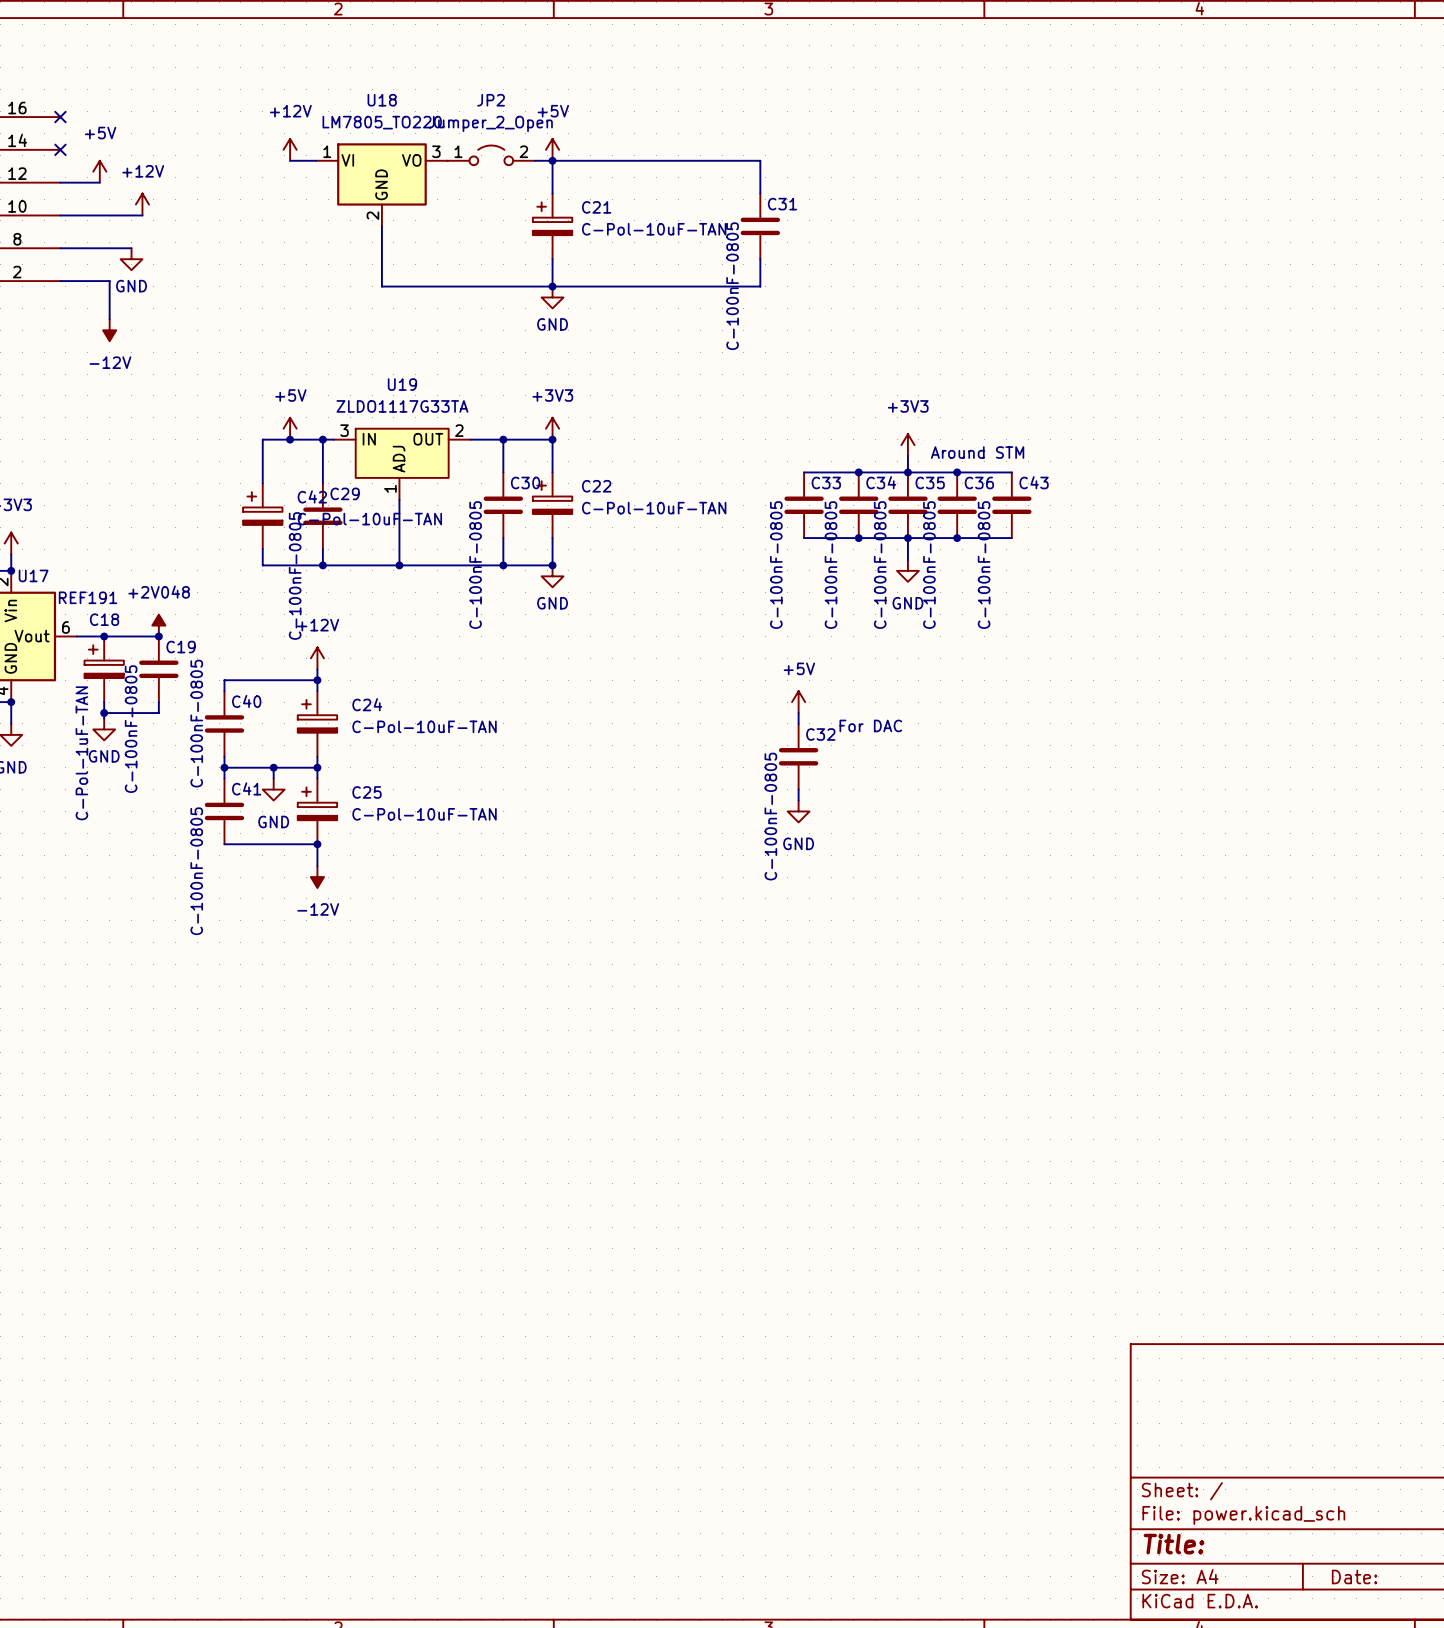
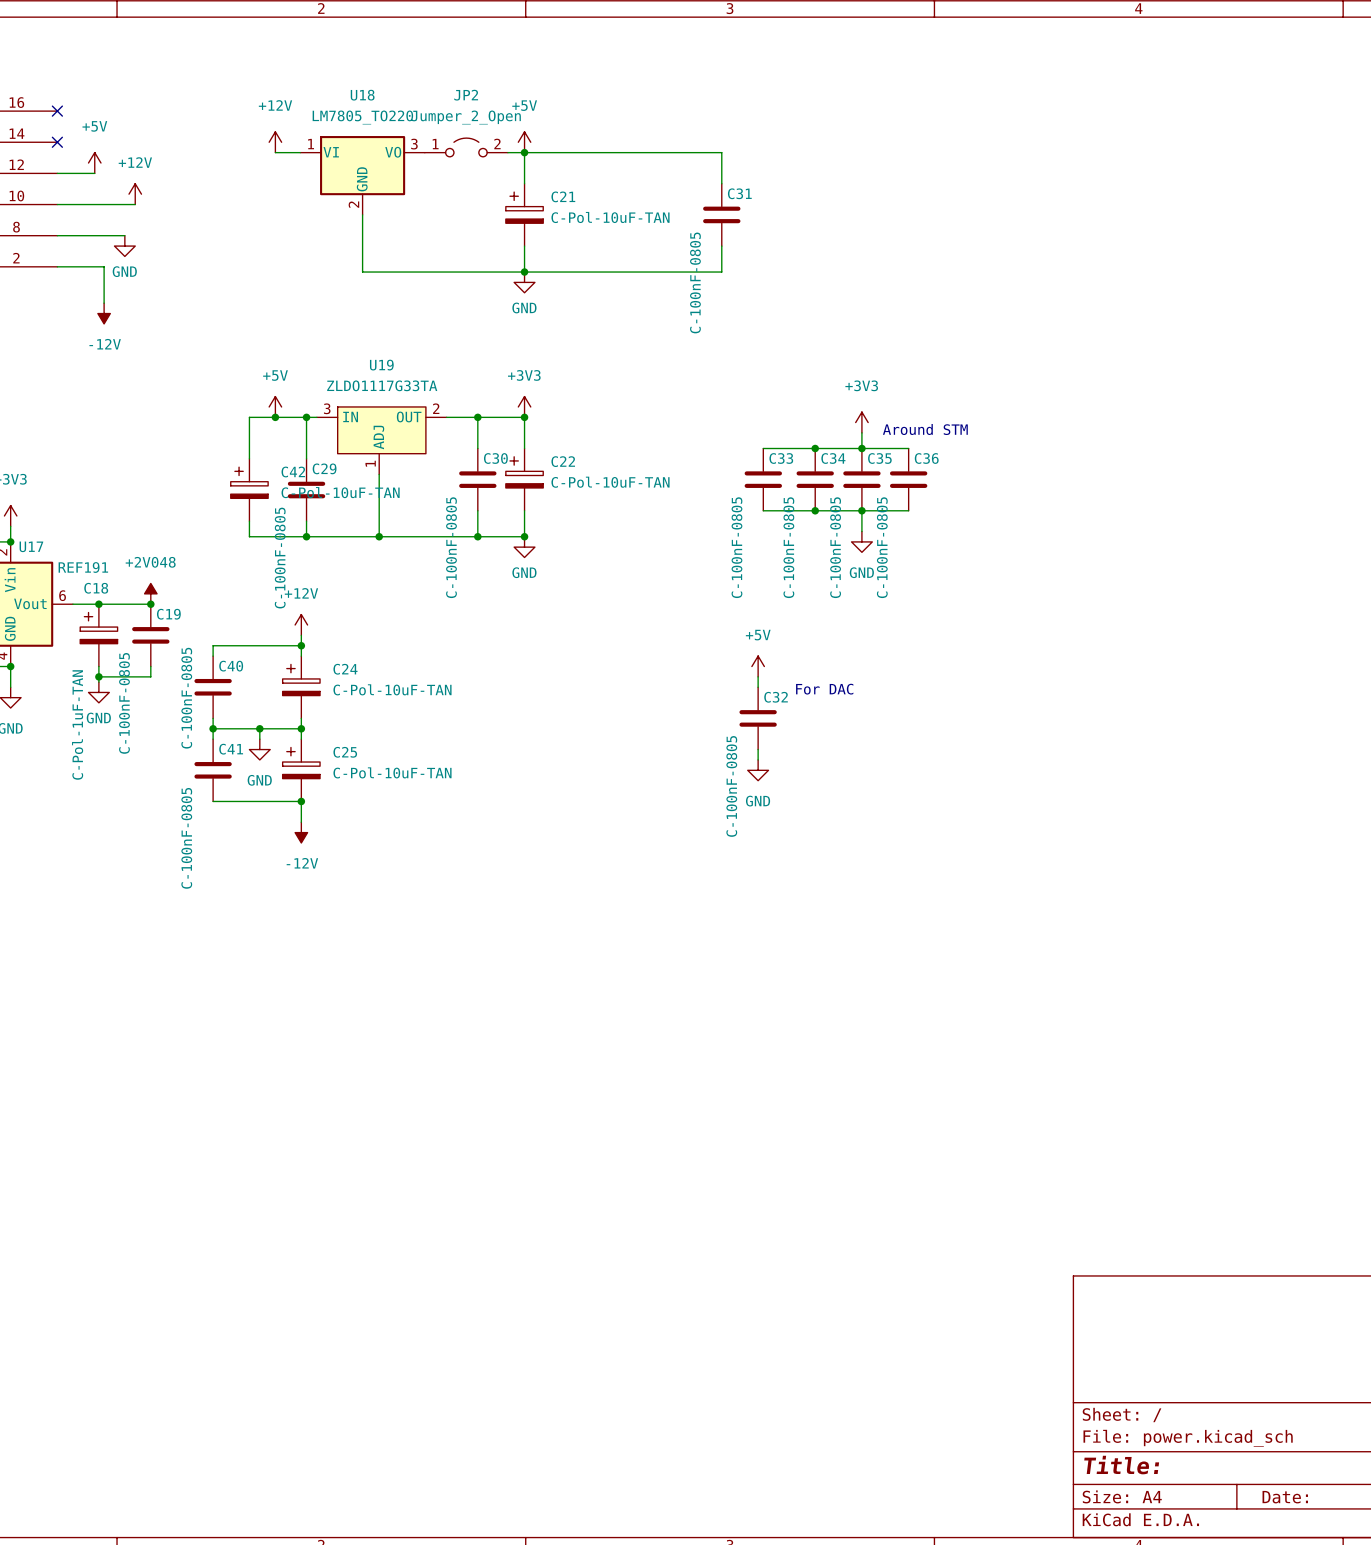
wire: (957, 472) (1011, 472) -> none
junction: (957, 472) -> none
C43: C-100nF-0805 (1011, 505) -> none
wire: (957, 538) (1011, 538) -> none
junction: (957, 538) -> none

